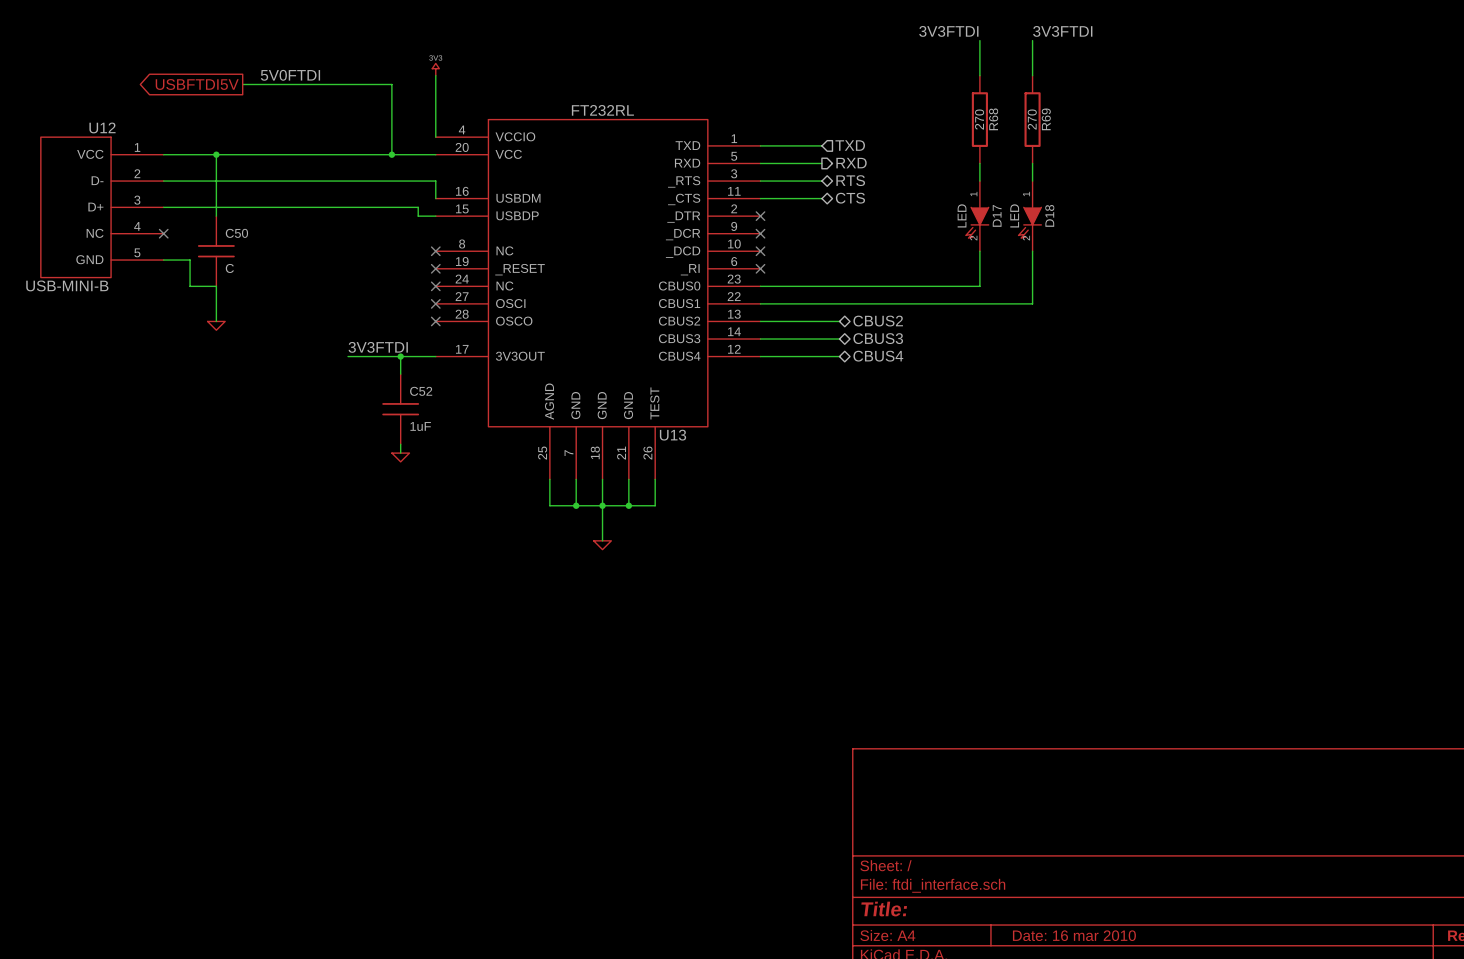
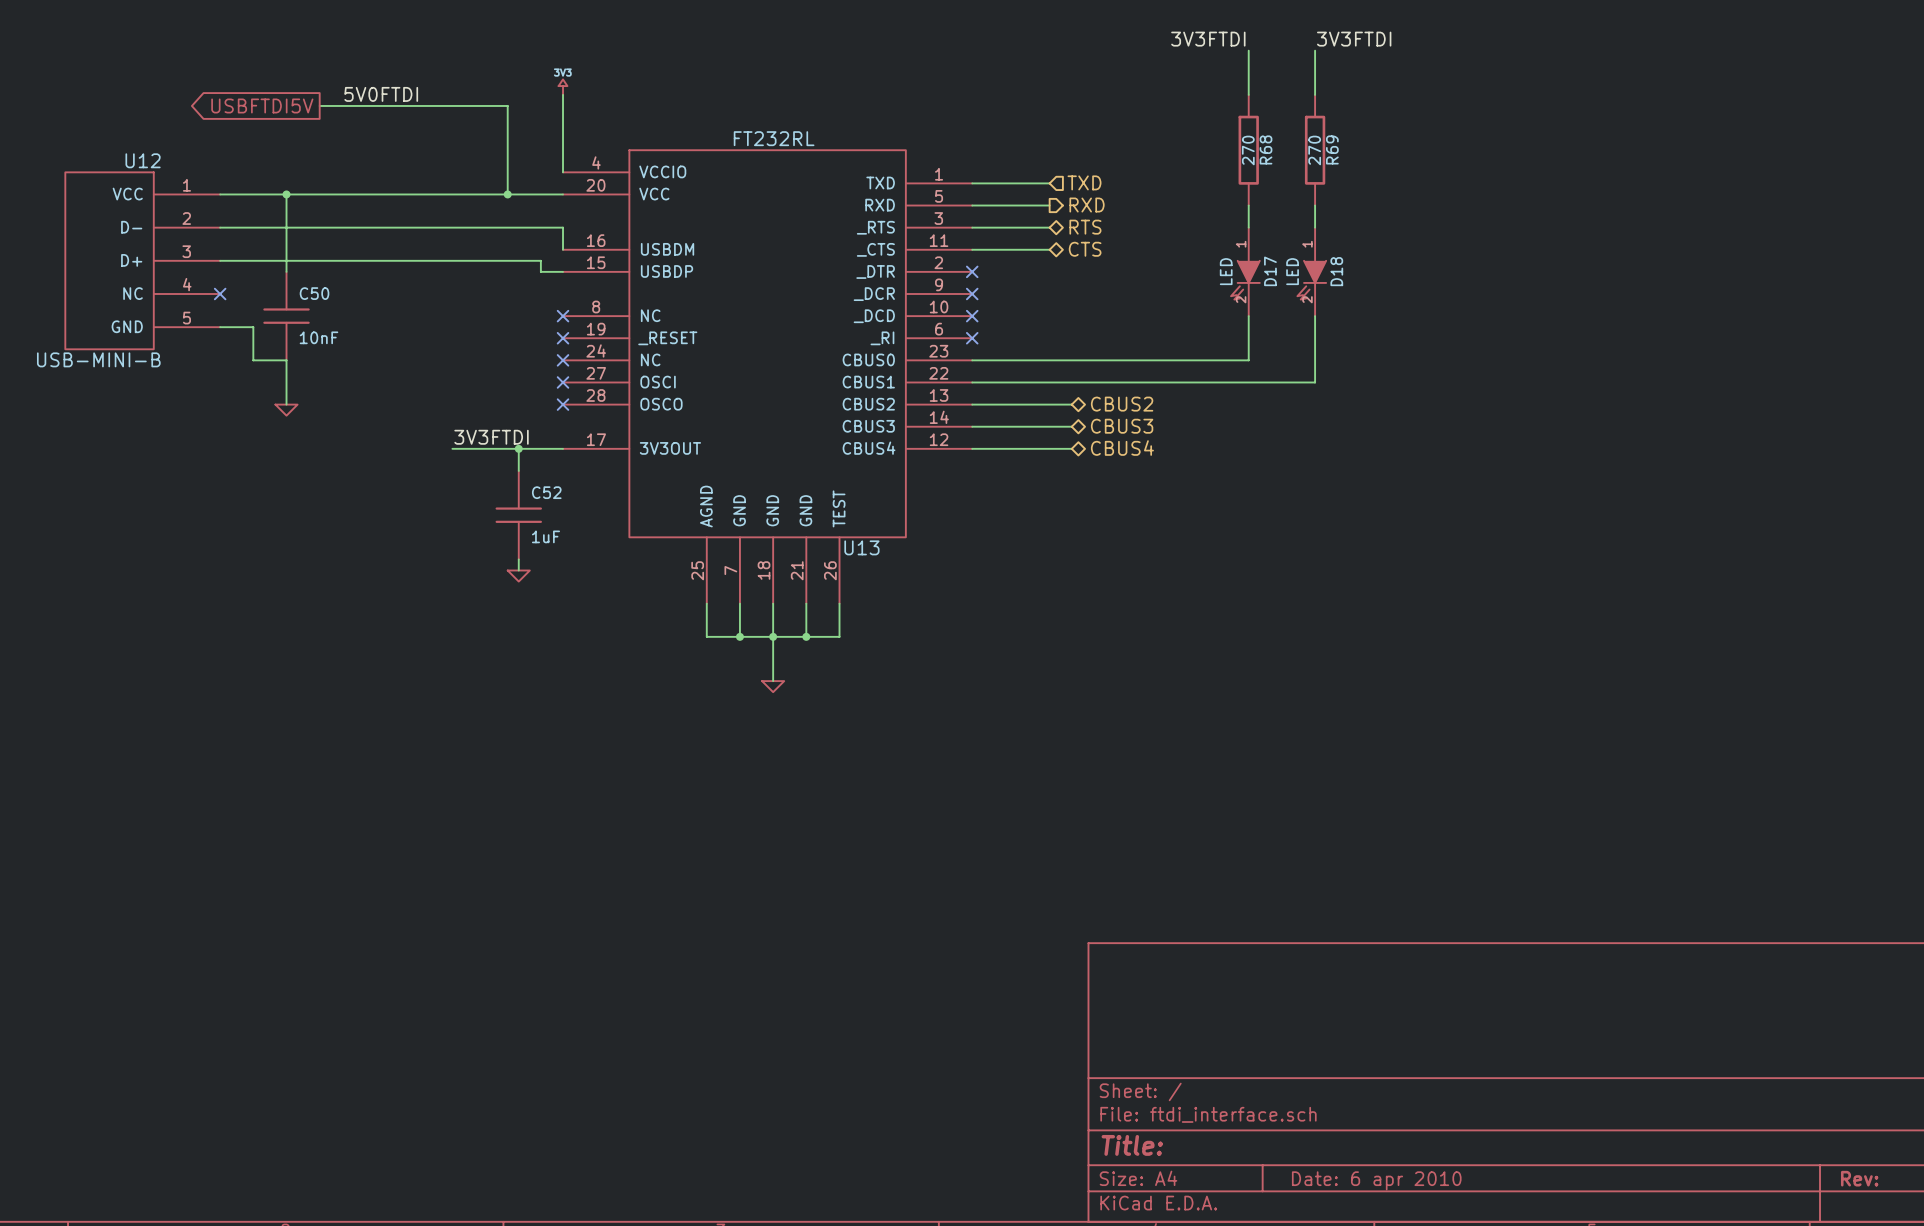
C50 value: C (229, 268) -> 10nF (318, 337)
title block: Date: 16 mar 2010 (1074, 935) -> Date: 6 apr 2010 (1376, 1180)

